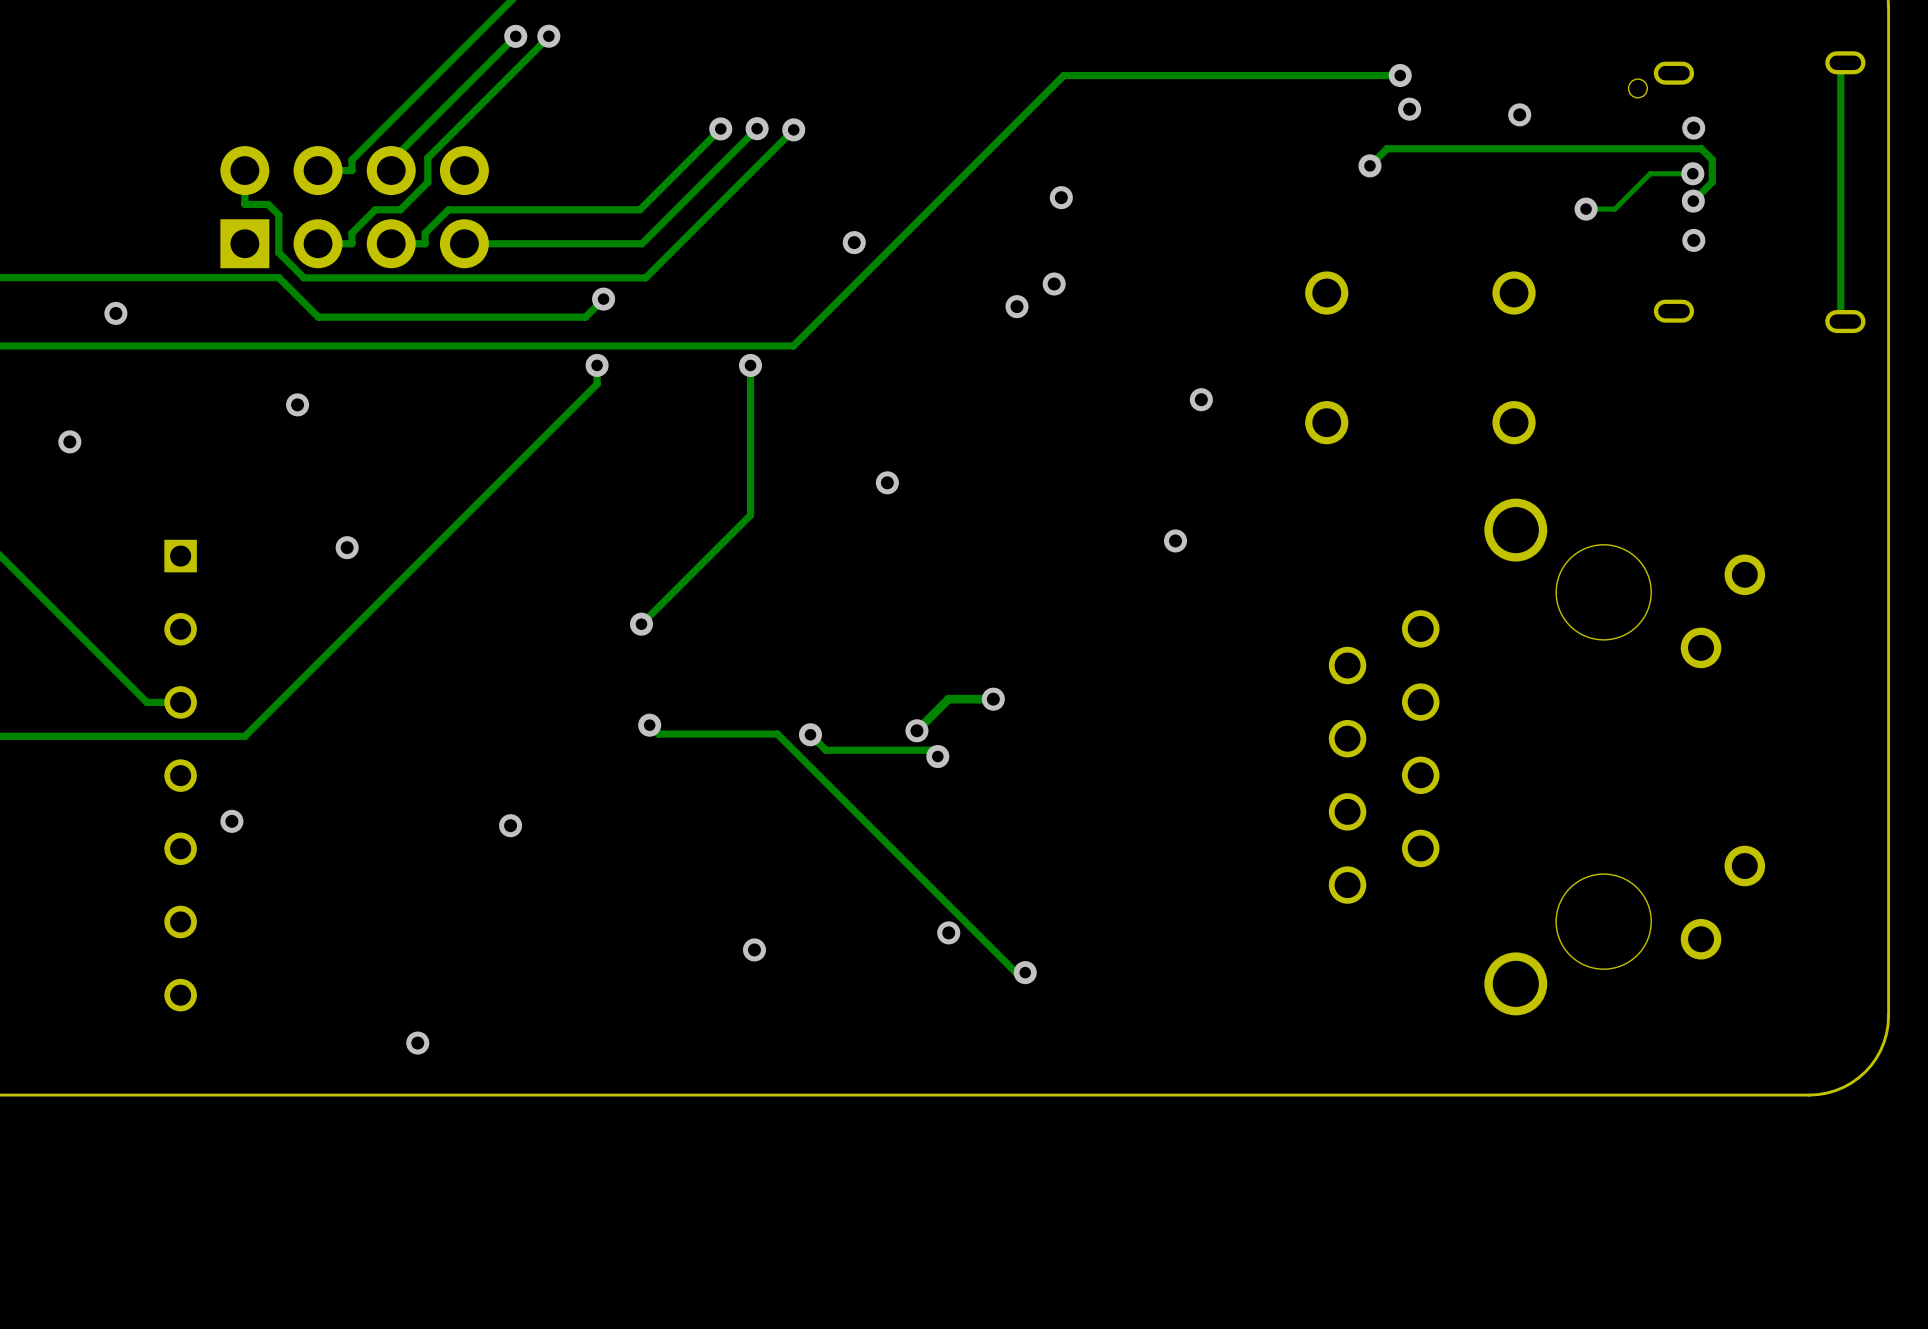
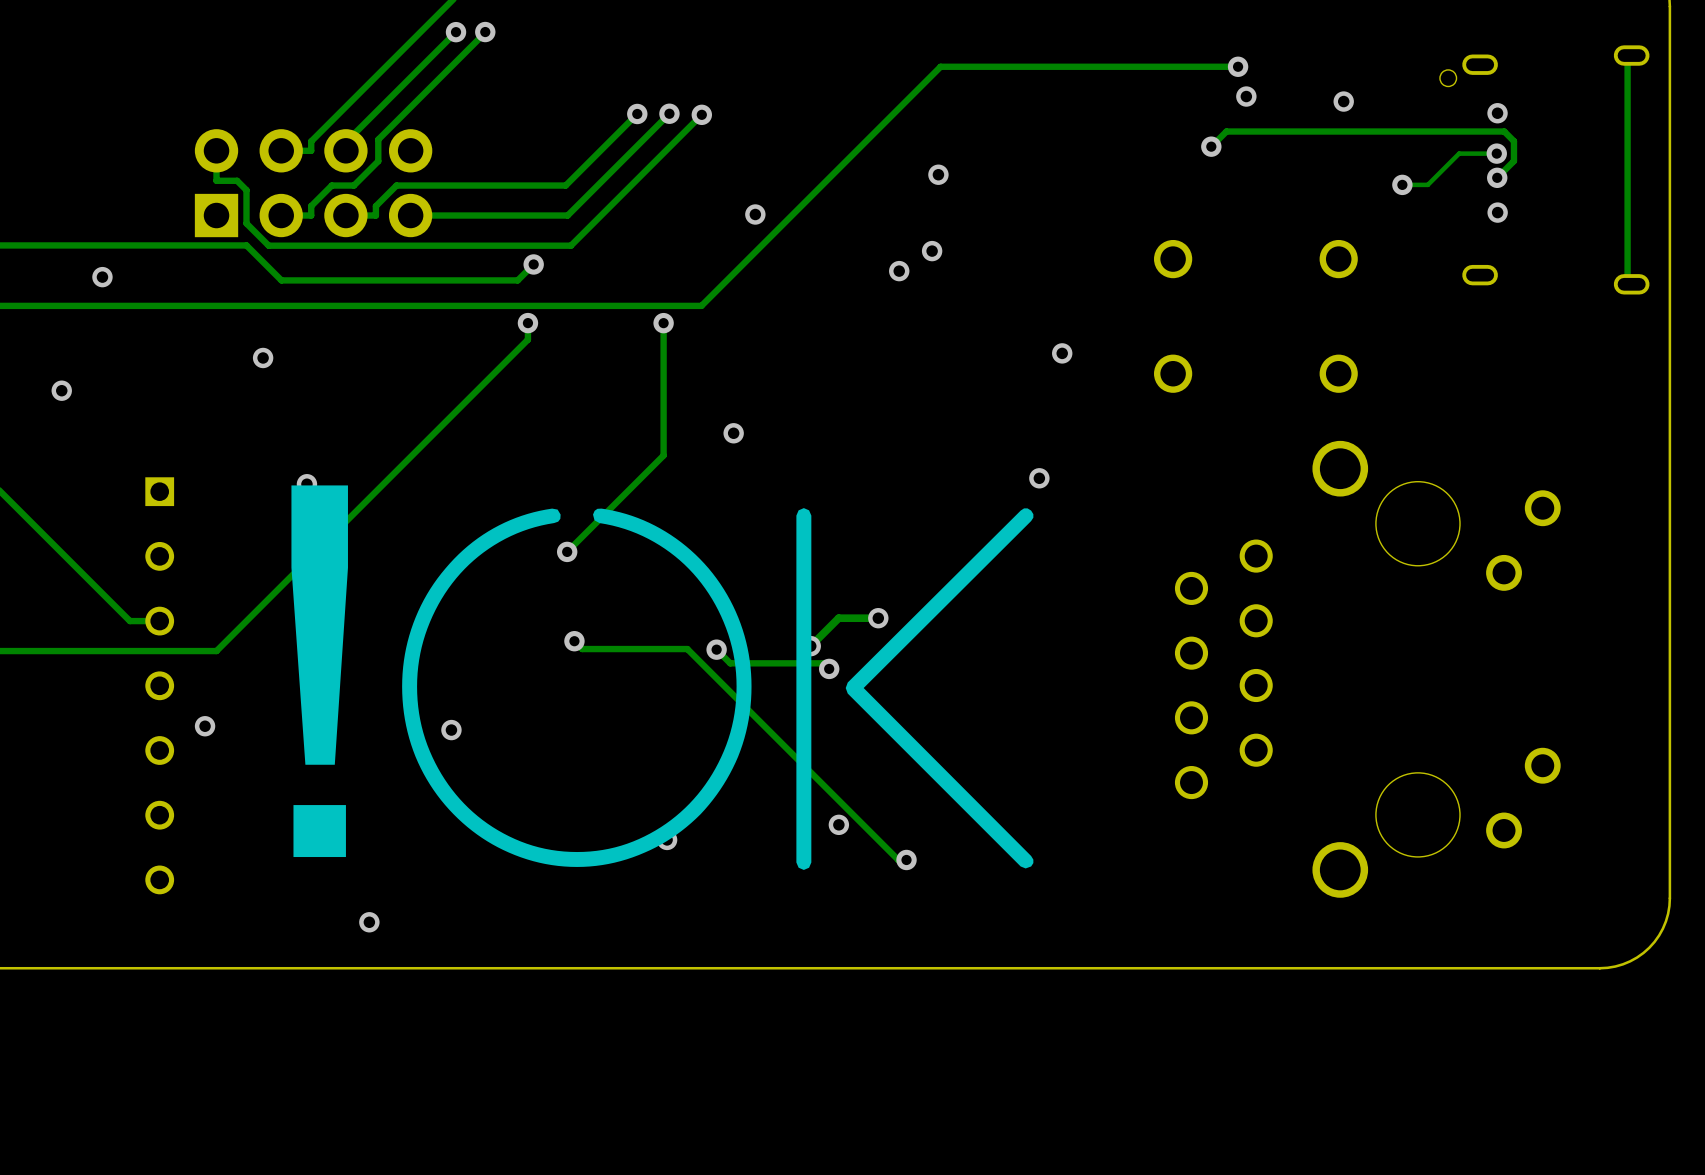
via position: (887, 482) -> (733, 433)
drawing: none -> [291, 485, 1034, 870]

